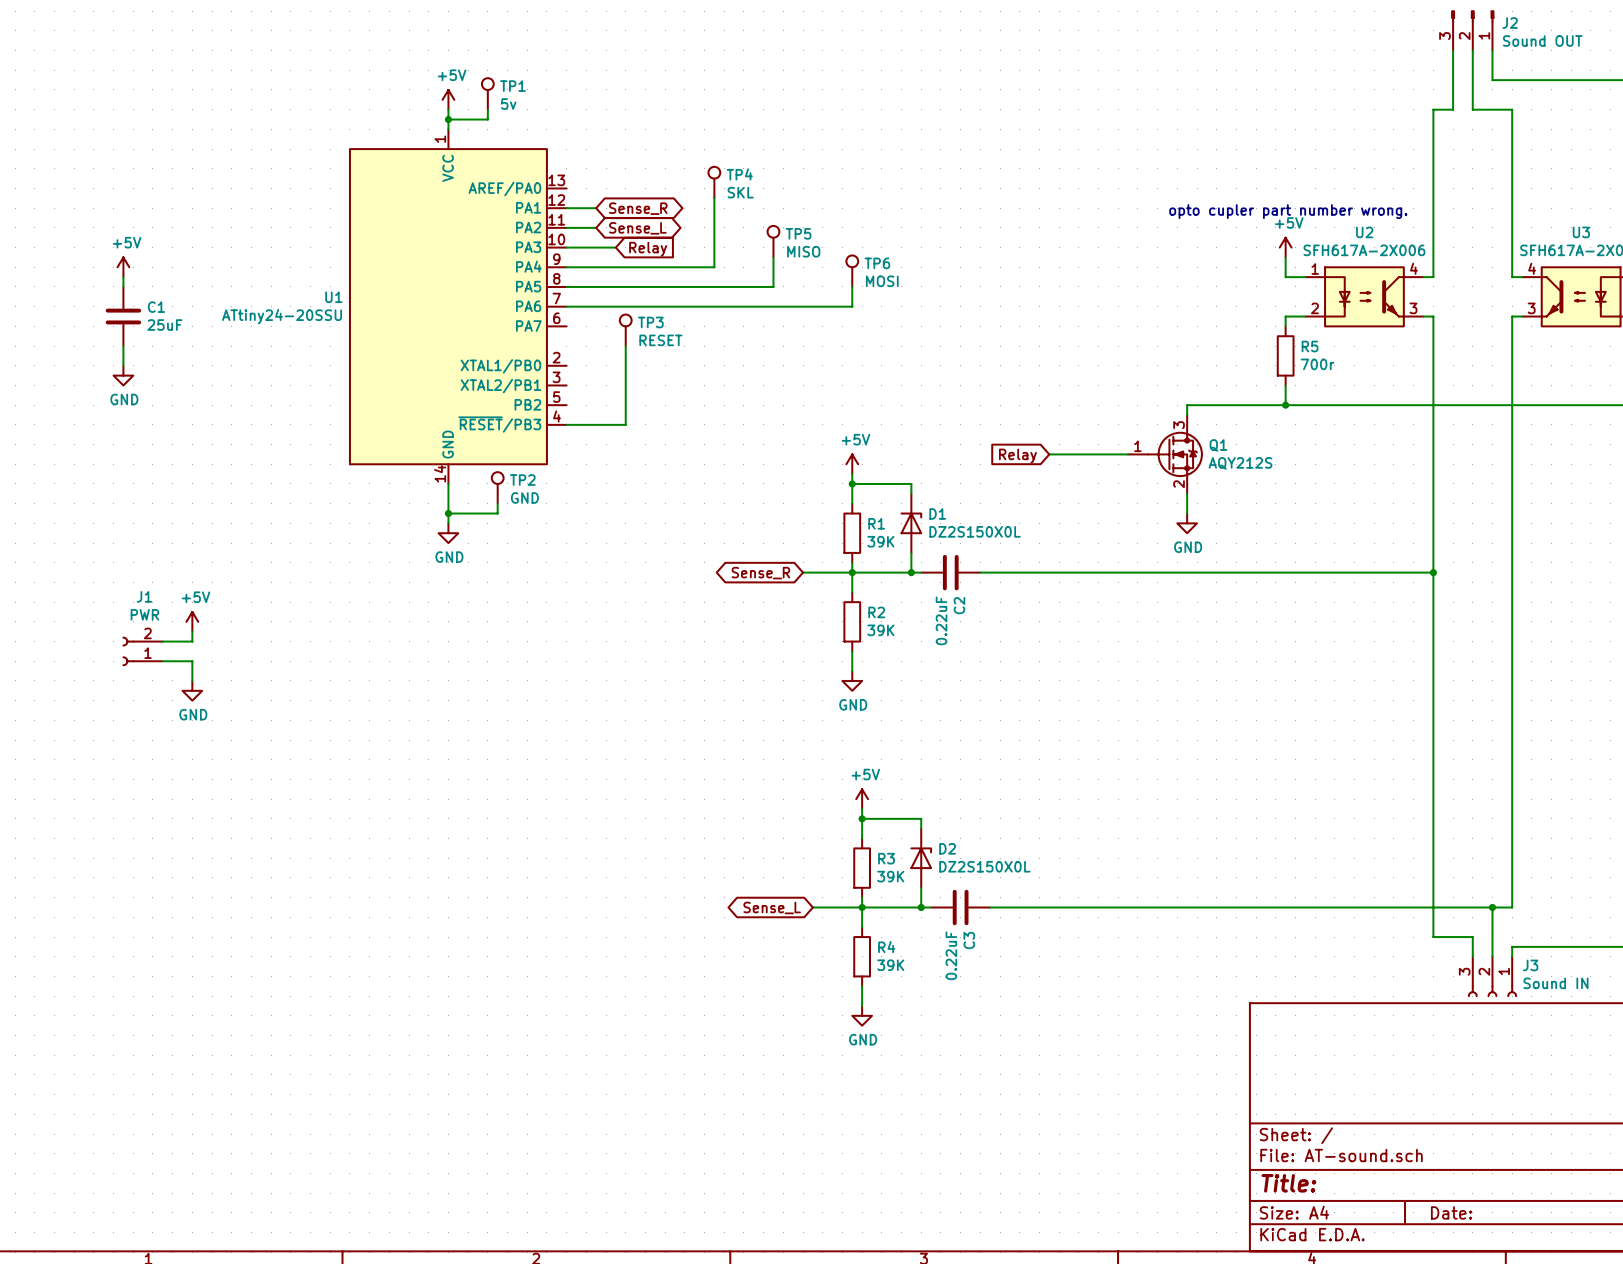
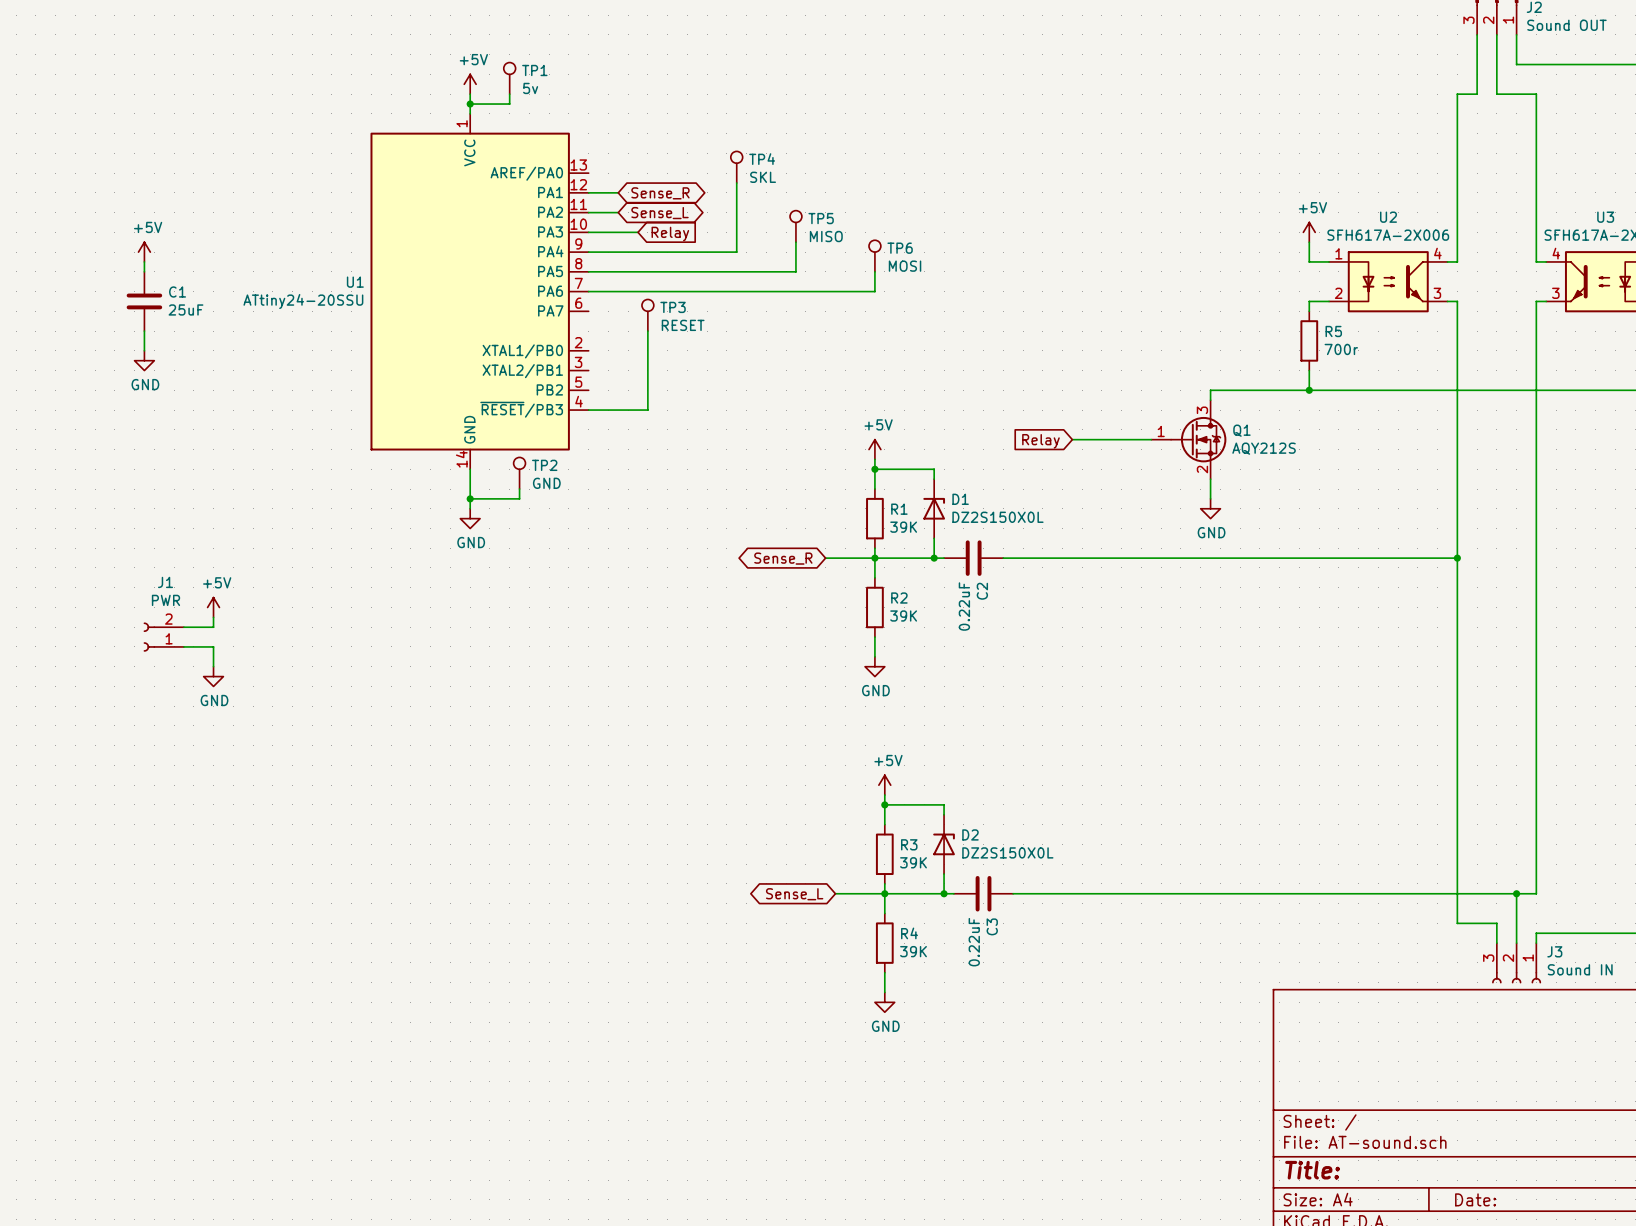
text: opto cupler part number wrong. (1288, 211) -> none

